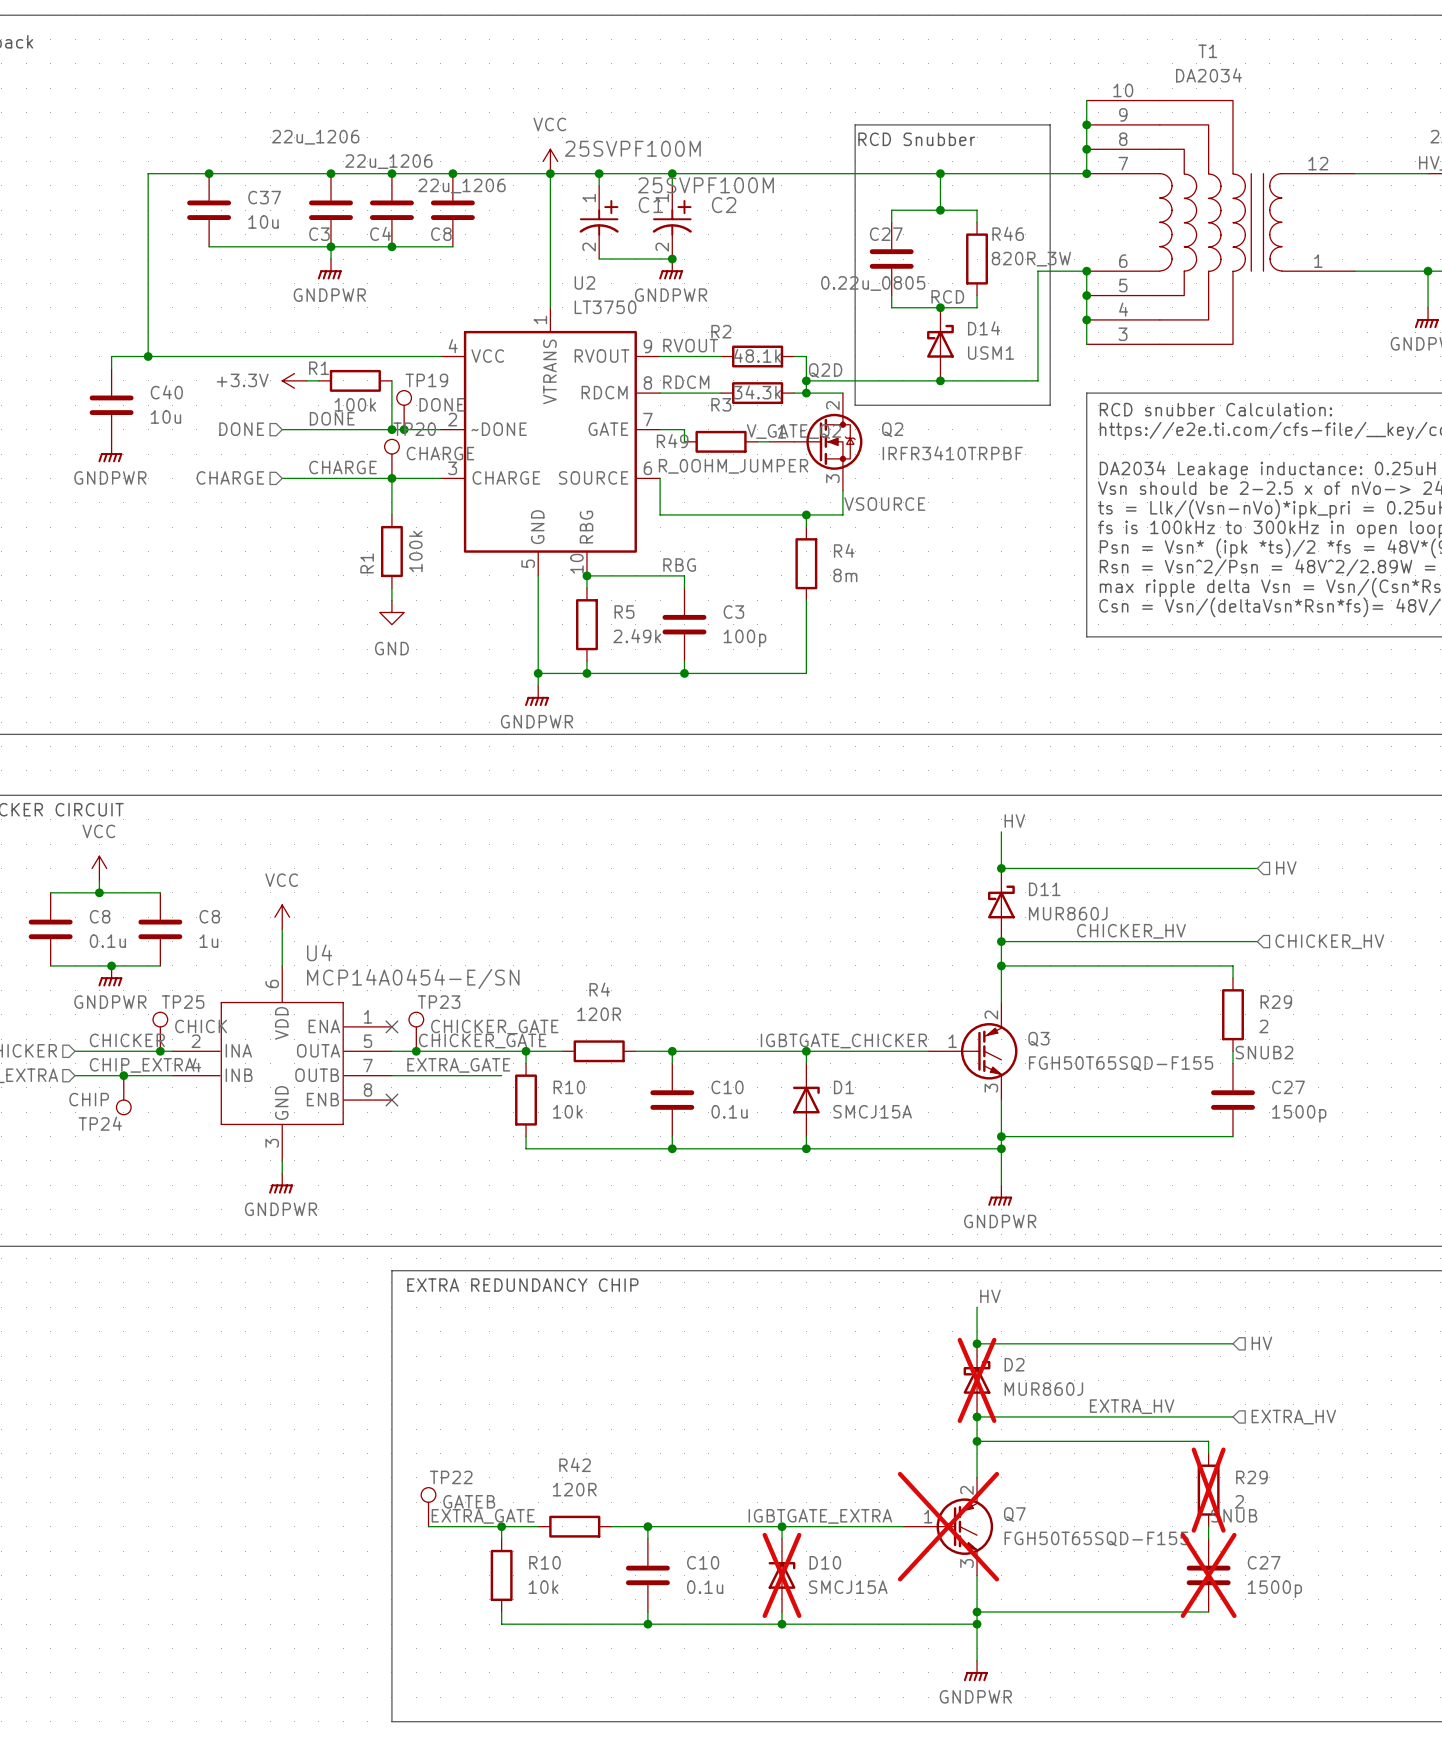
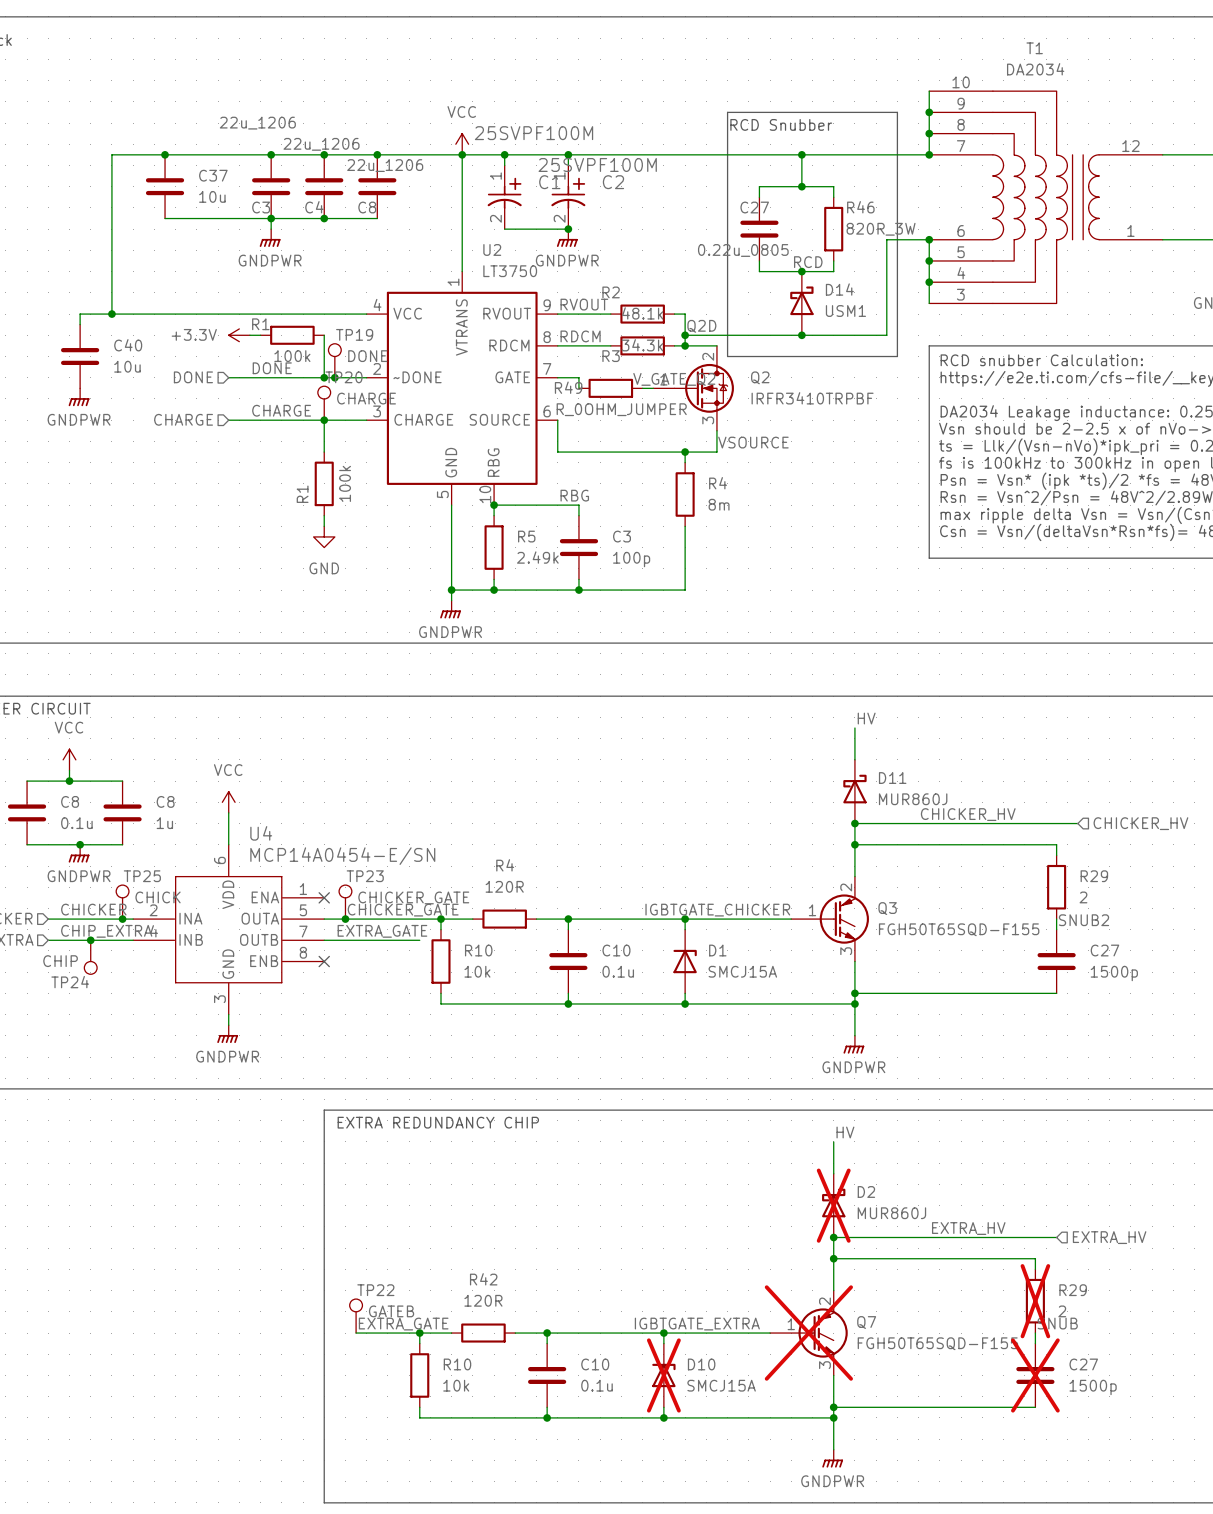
wire: (1001, 868) (1257, 868) -> none
junction: (1001, 868) -> none
hierarchical label: HV (1286, 868) -> none
wire: (977, 1343) (1232, 1343) -> none
junction: (977, 1343) -> none
hierarchical label: HV (1261, 1343) -> none

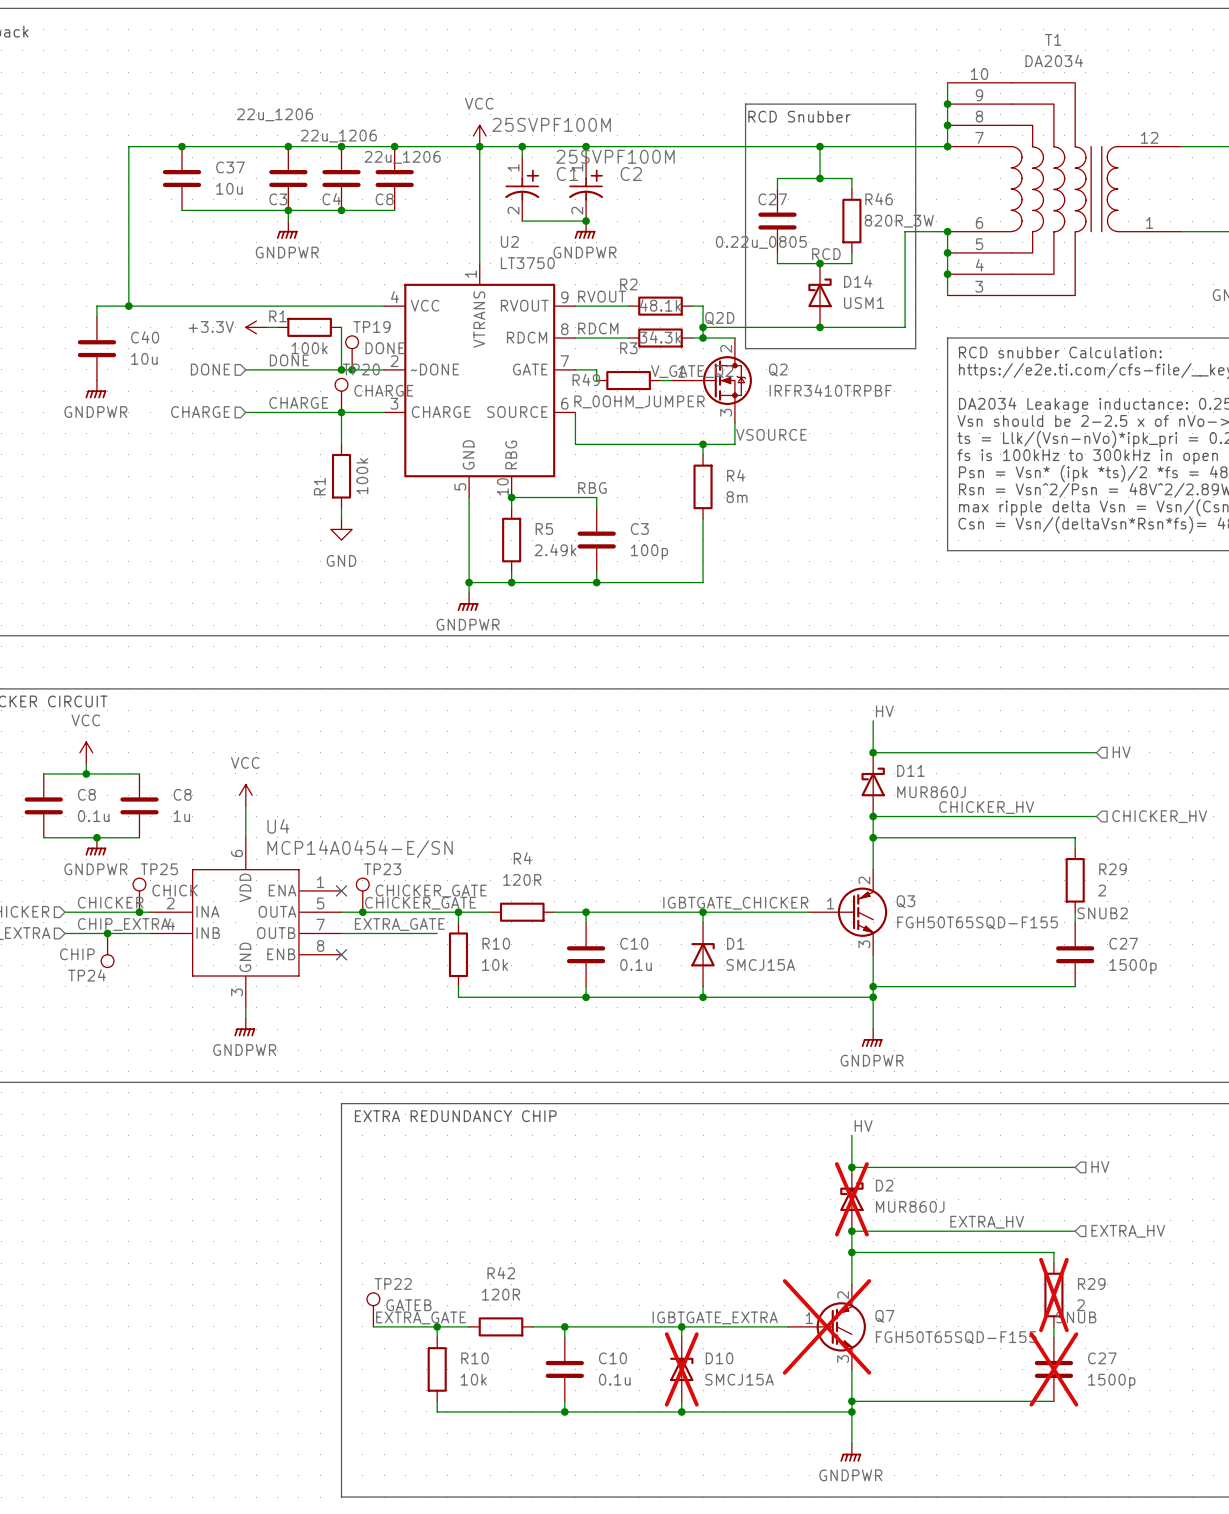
wire: none -> (873, 752) (1096, 752)
junction: none -> (873, 752)
hierarchical label: none -> HV (1121, 752)
wire: none -> (851, 1167) (1075, 1167)
junction: none -> (851, 1167)
hierarchical label: none -> HV (1100, 1167)

